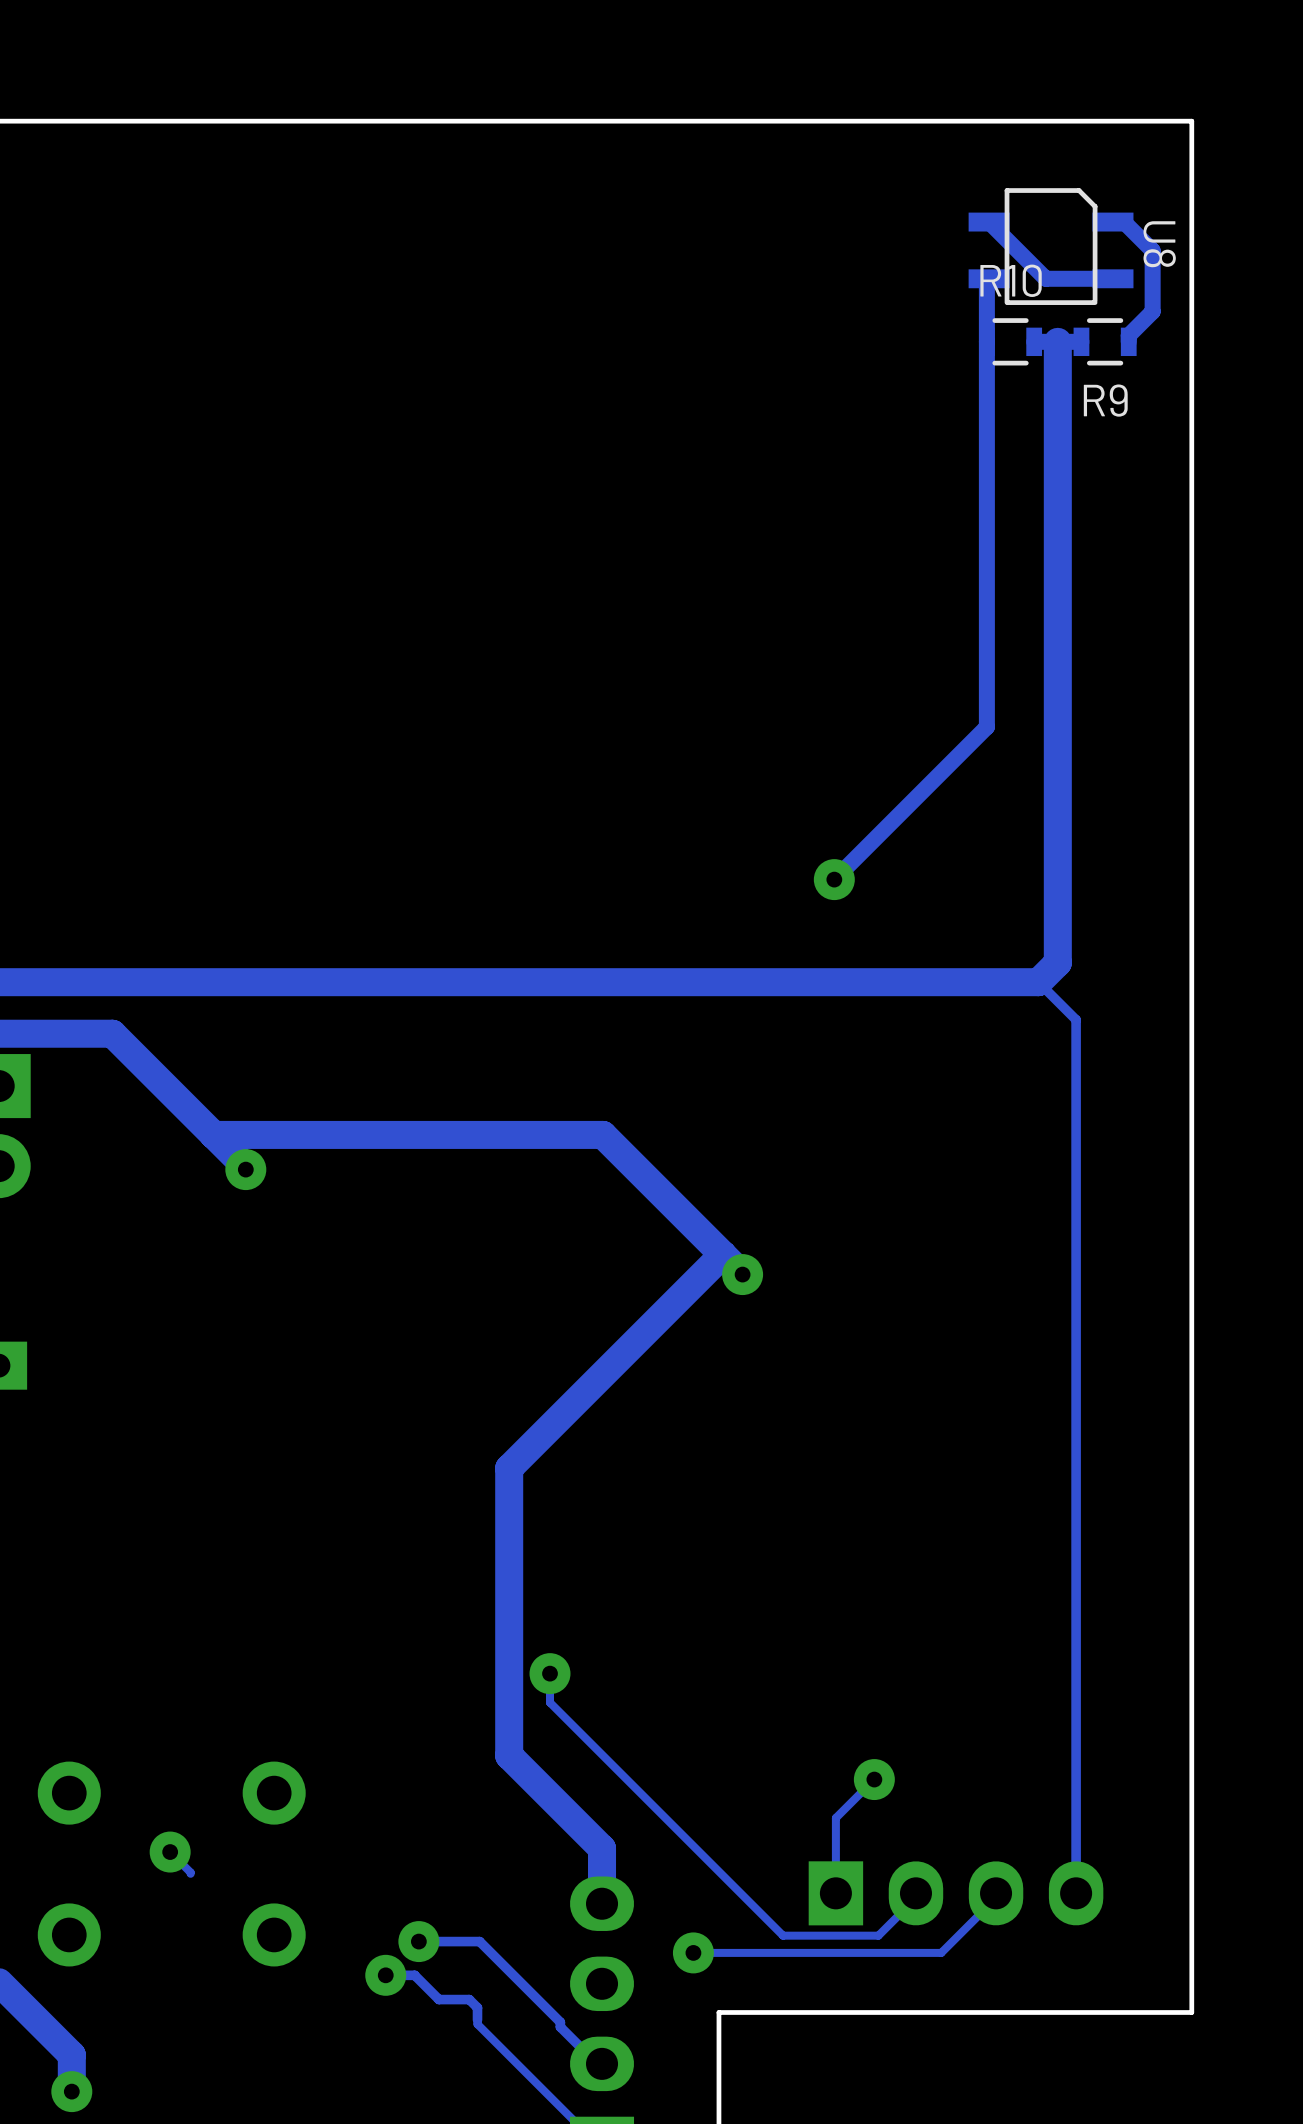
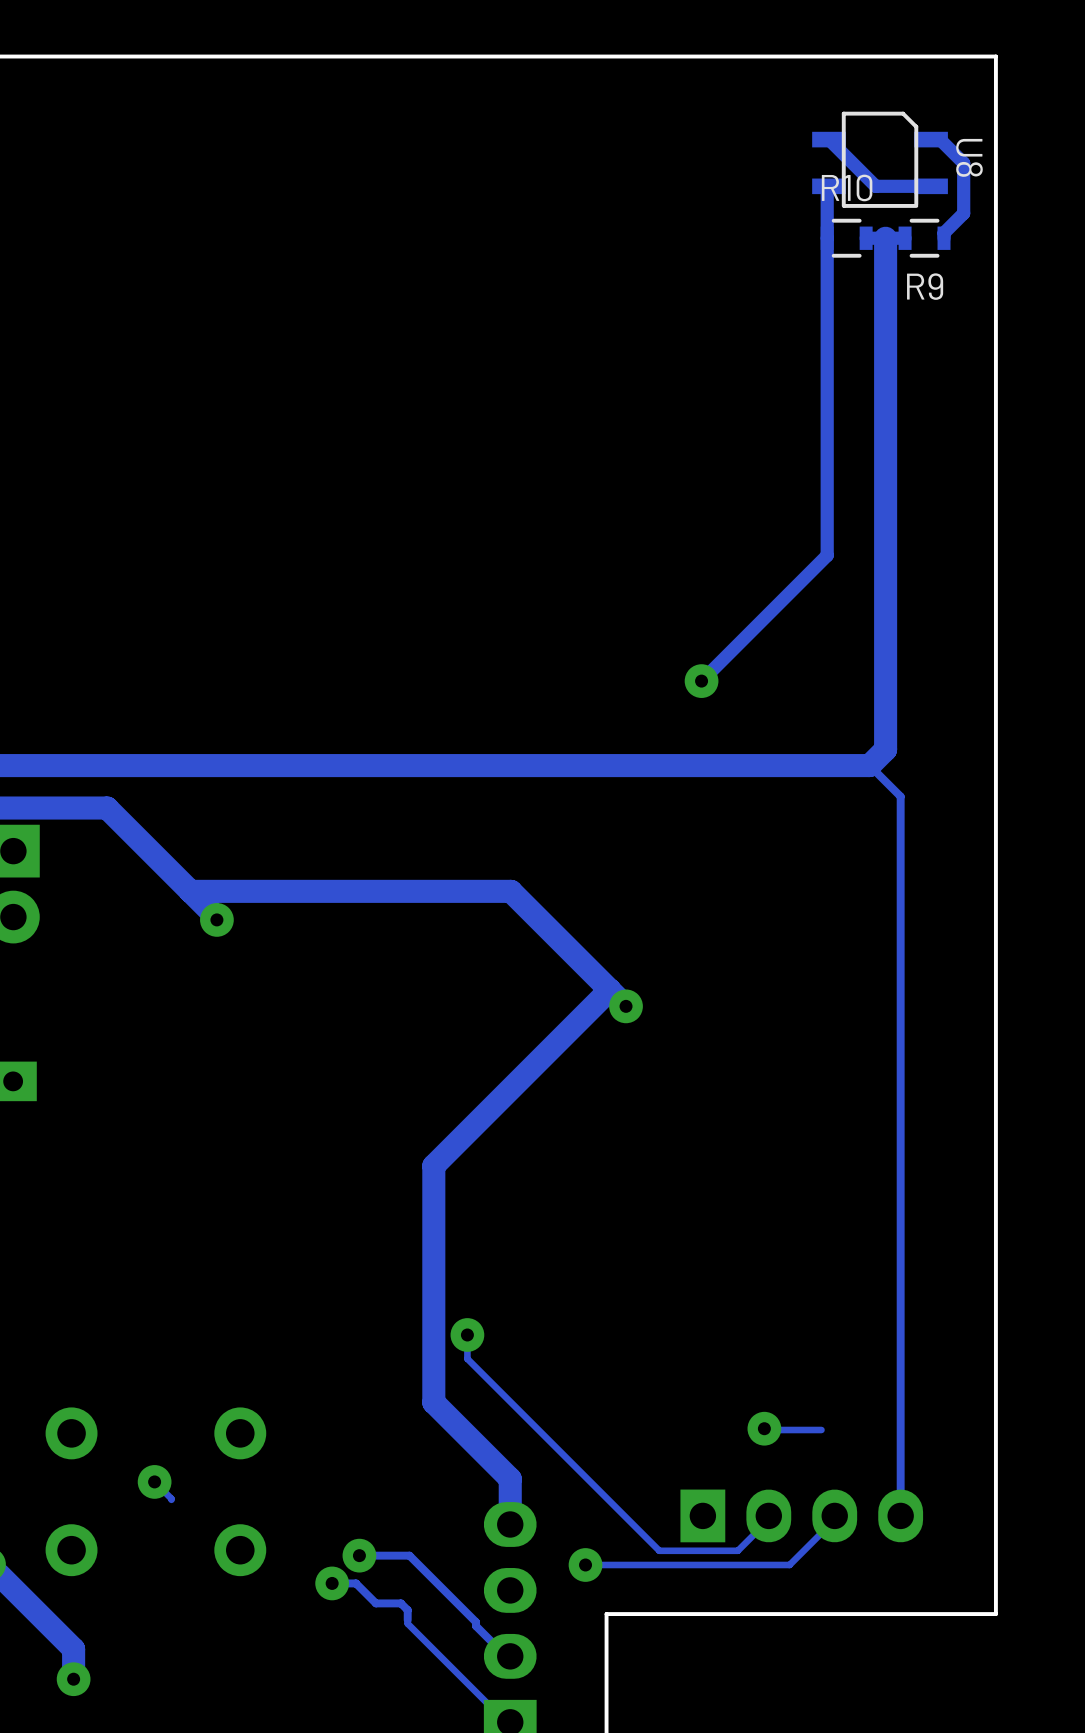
track: (874, 1779) (835, 1818) (835, 1893) -> none
via position: (874, 1779) -> (764, 1428)
track: none -> (764, 1428) (821, 1430)

